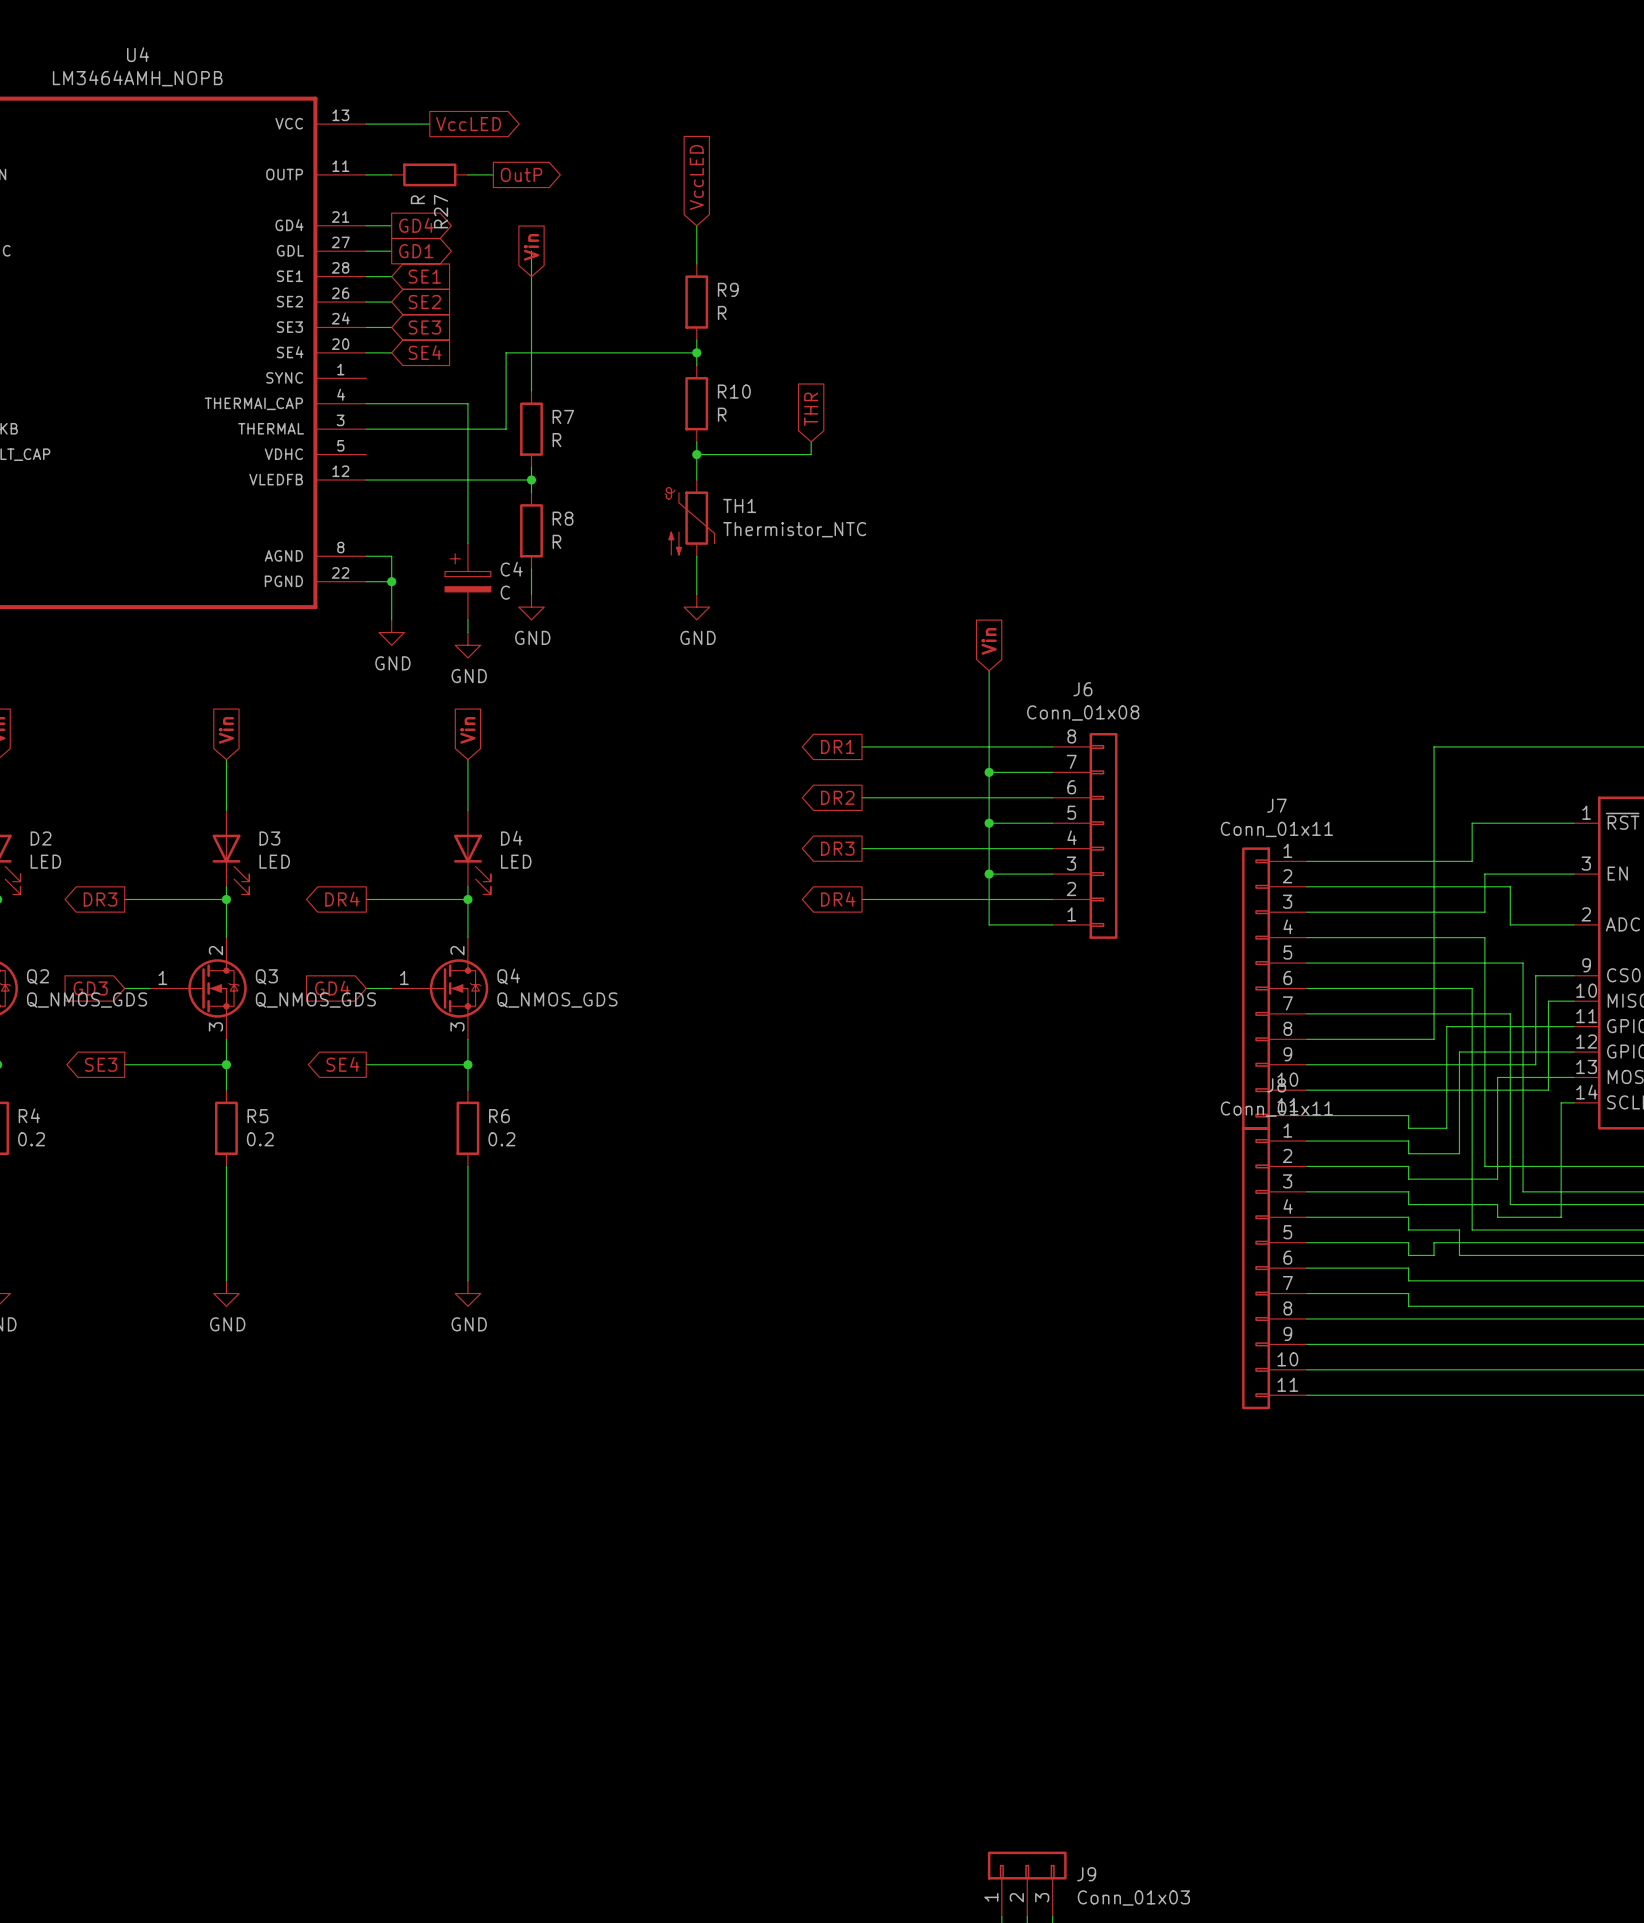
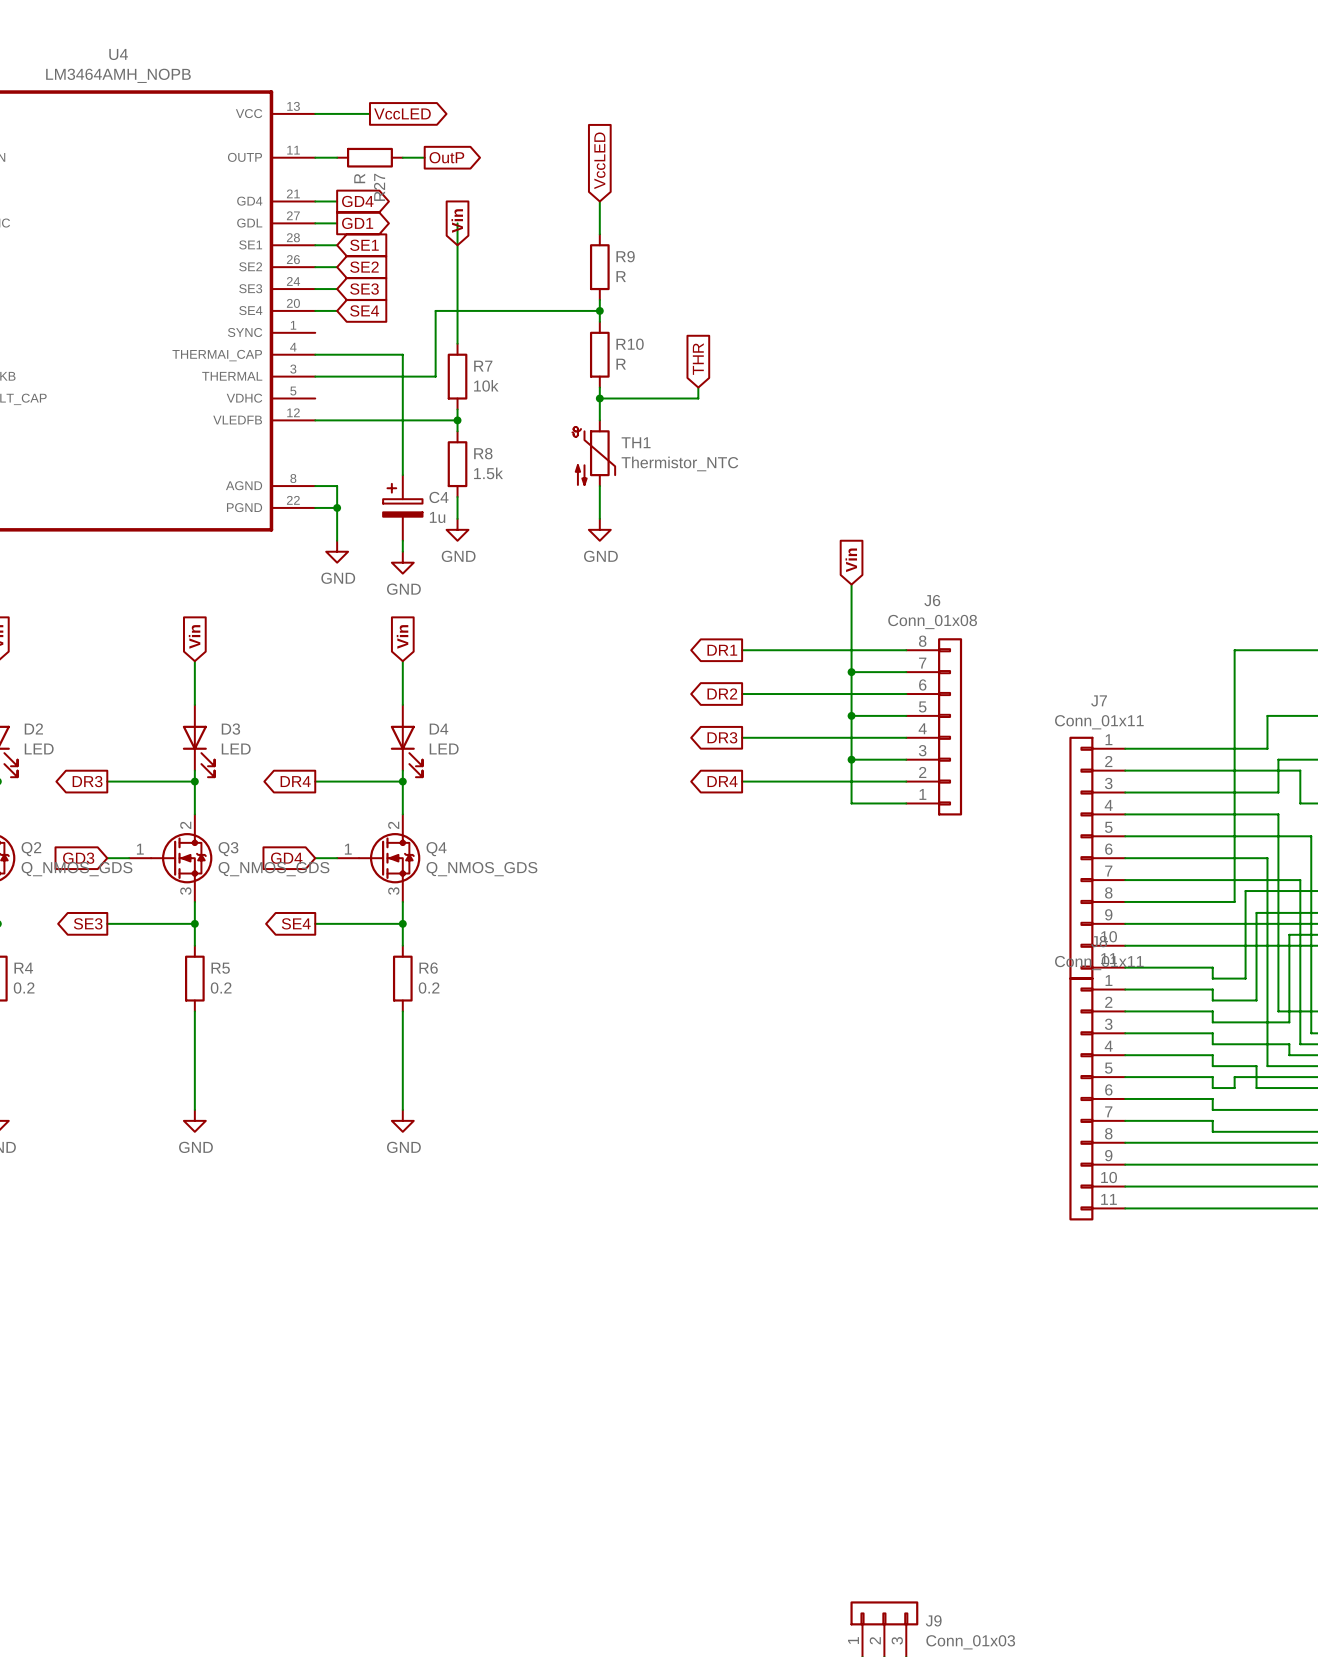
R7 value: R (556, 440) -> 10k (486, 385)
R8 value: R (556, 541) -> 1.5k (488, 473)
C4 value: C (505, 592) -> 1u (437, 517)

